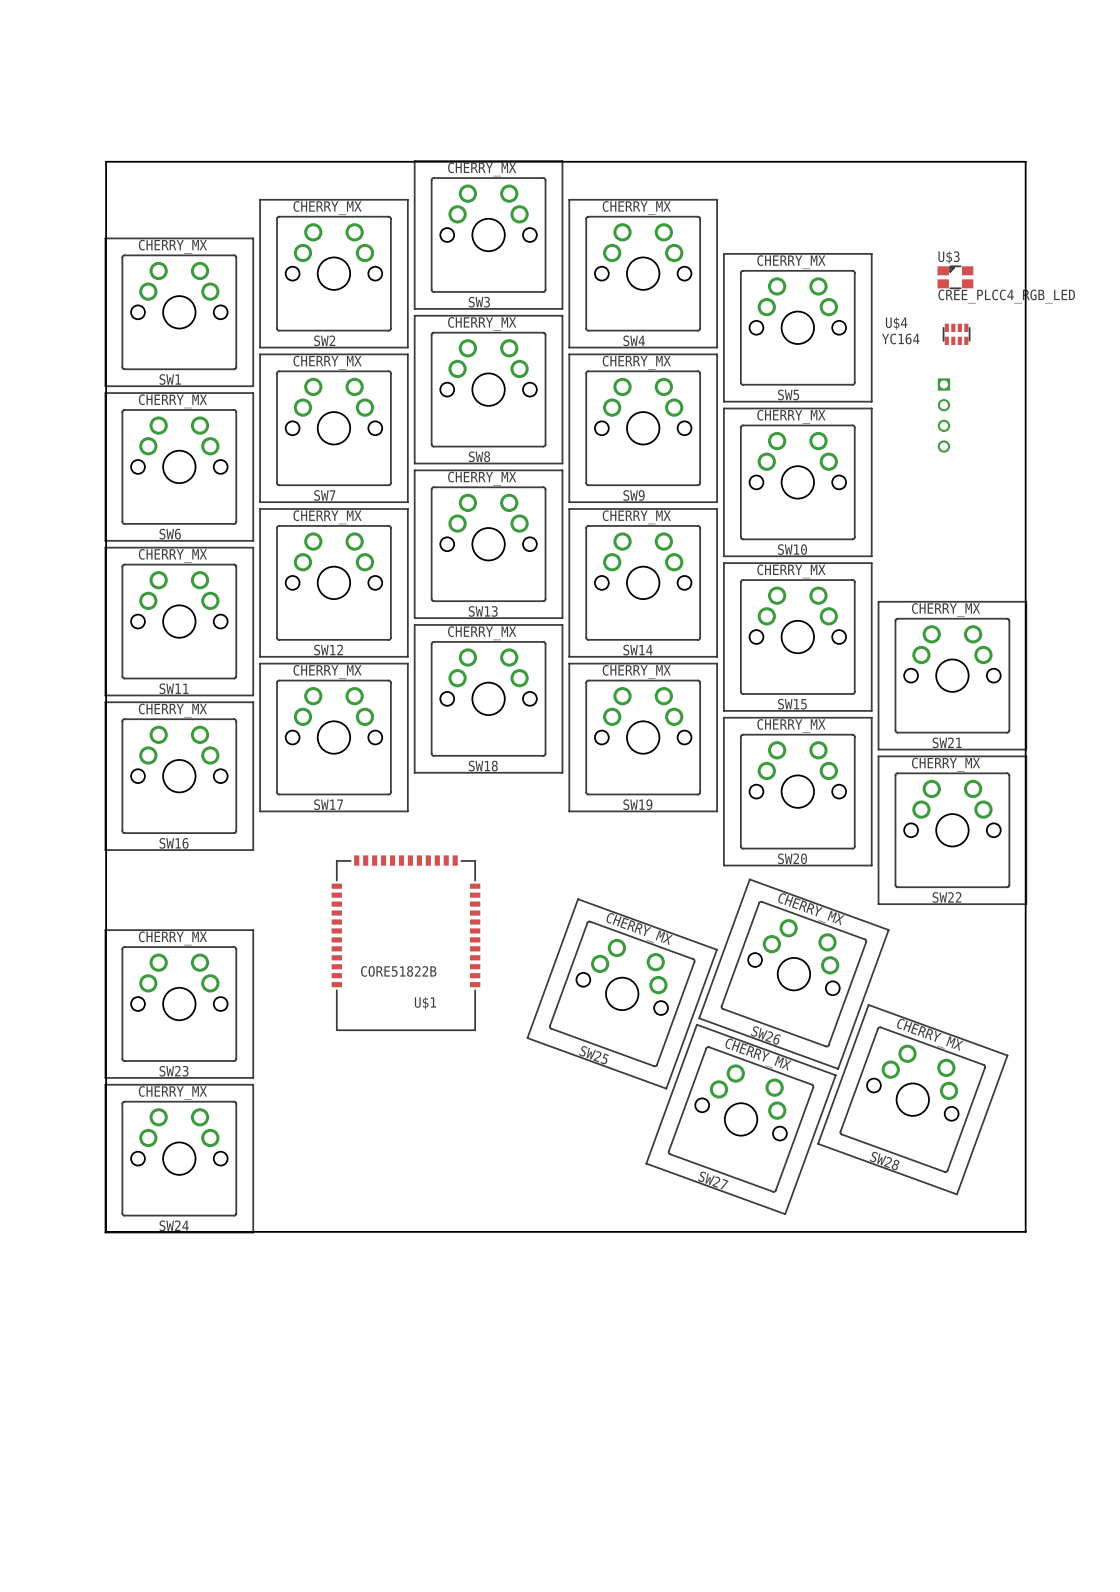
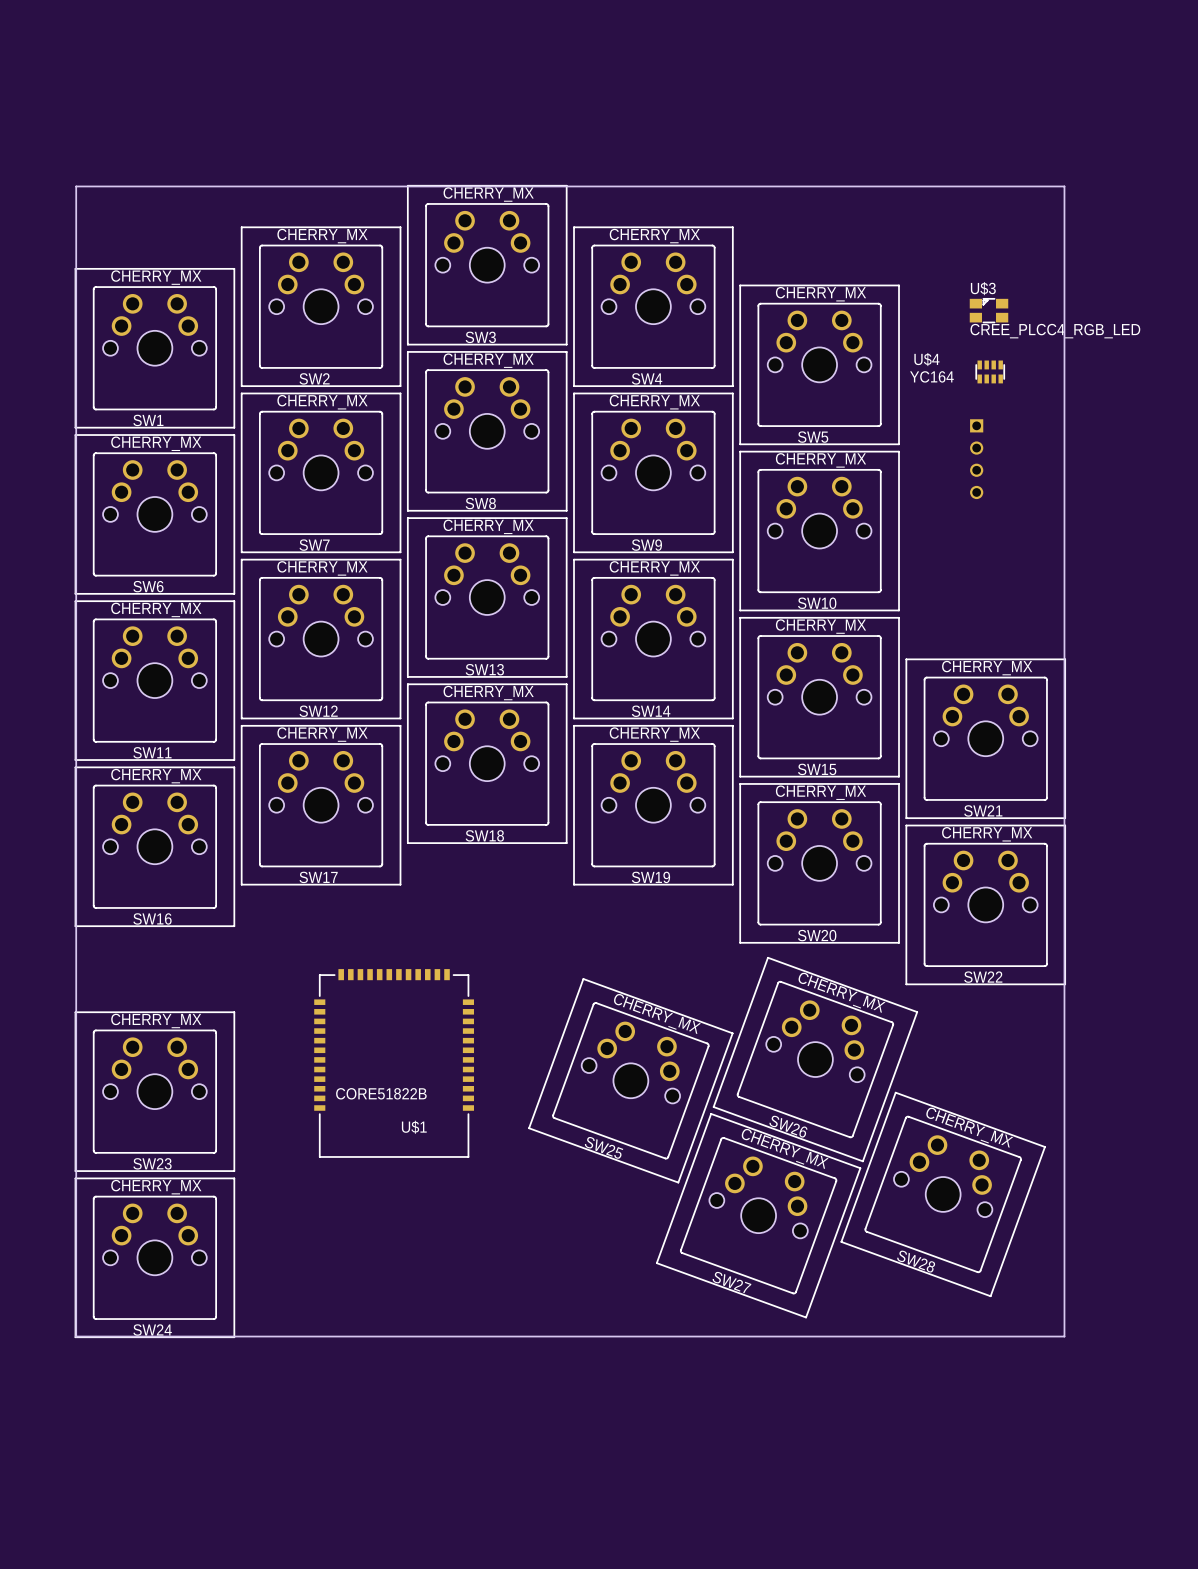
U$1 position: (405, 943) -> (394, 1063)

